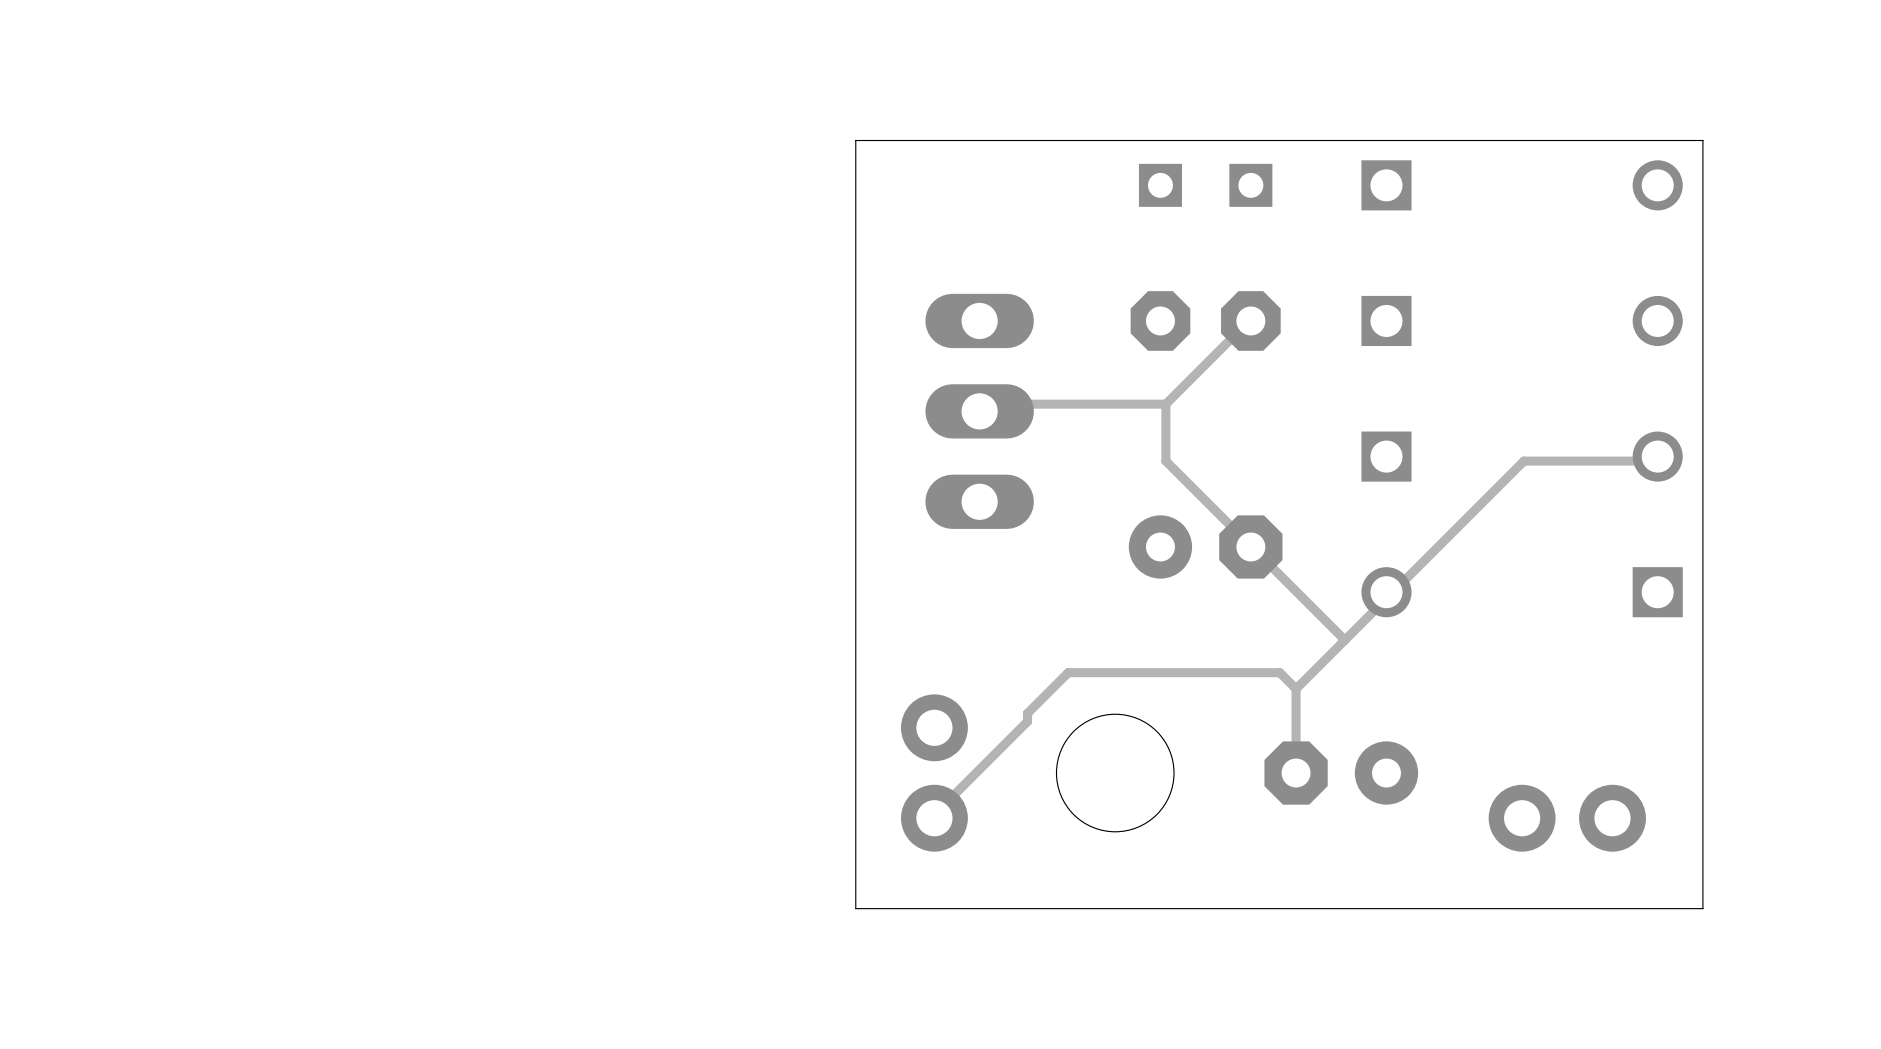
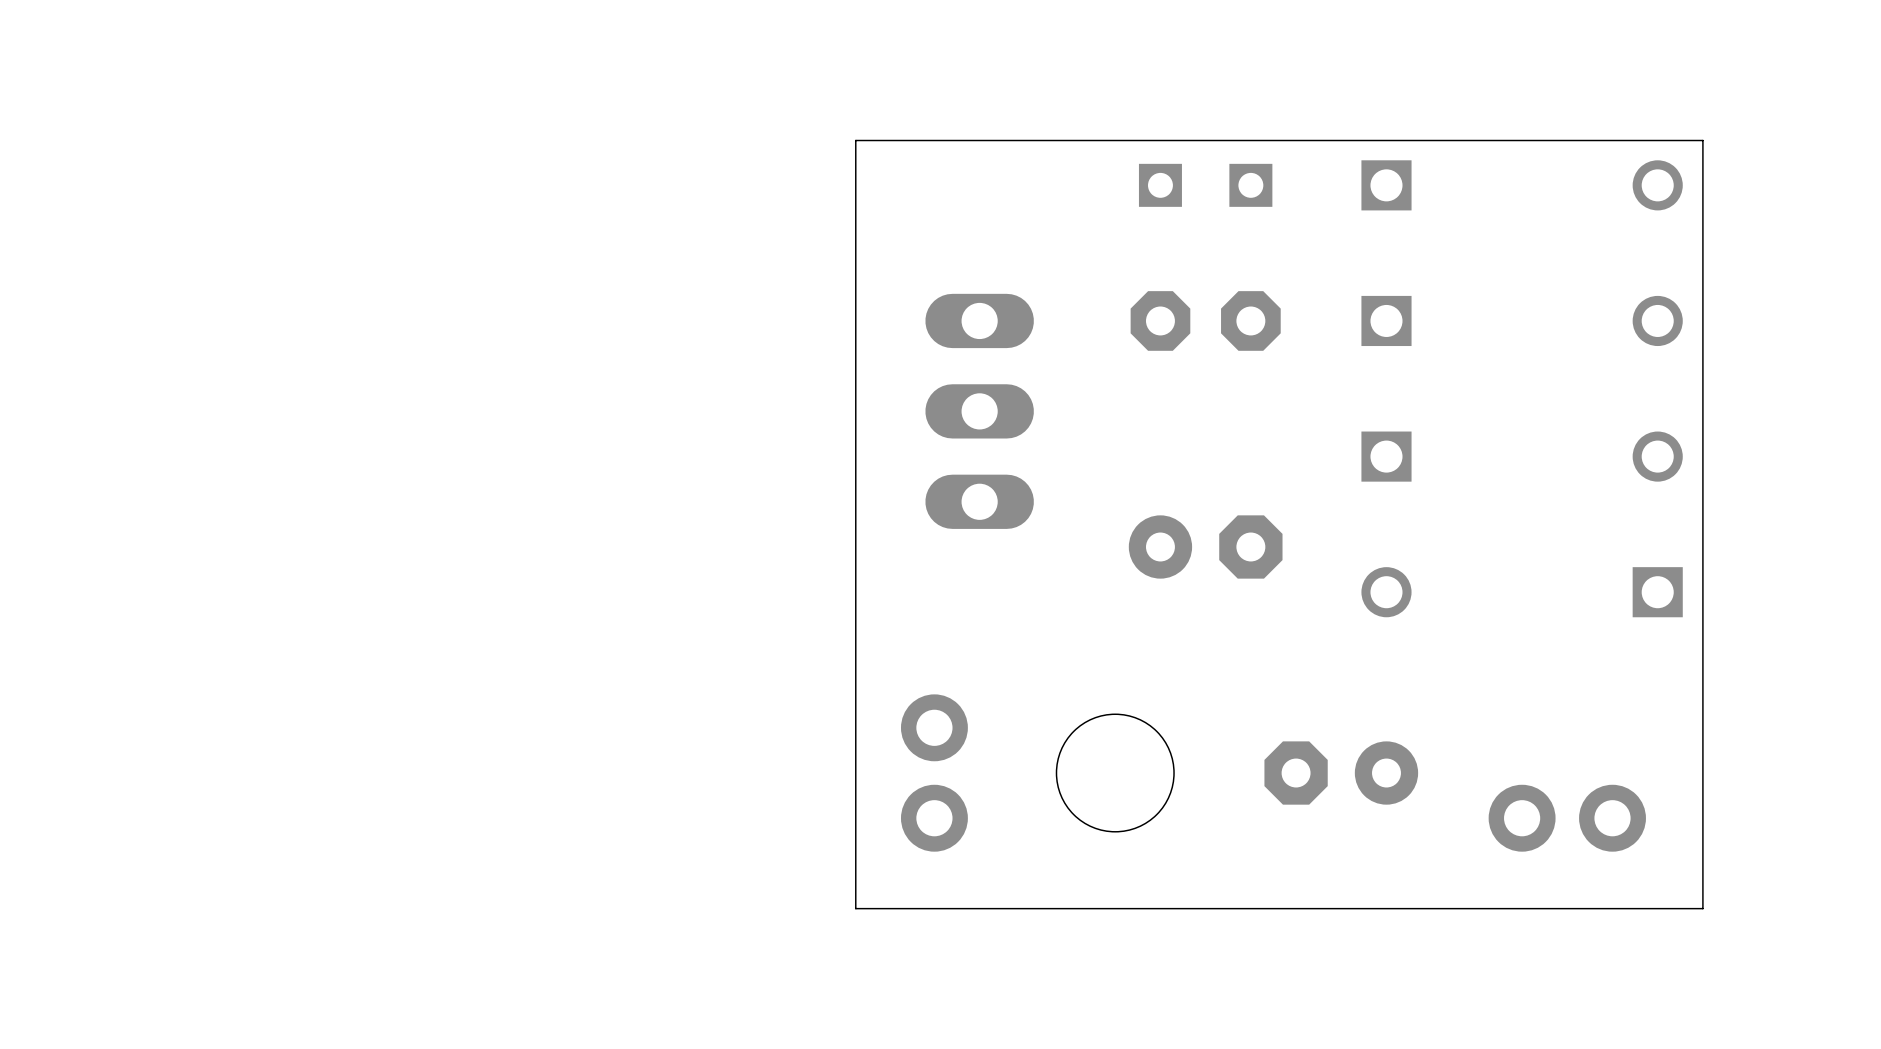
track: (1250, 320) (1165, 404) -> none
track: (1165, 404) (986, 404) (979, 411) -> none
track: (1165, 404) (1165, 461) (1344, 640) -> none
track: (1657, 456) (1654, 461) (1523, 461) (1393, 591) (1386, 592) (1385, 599) (1296, 688) -> none
track: (1296, 688) (1296, 773) -> none
track: (1296, 688) (1279, 672) (1068, 672) (1027, 713) (1027, 721) (938, 810) (934, 818) -> none

